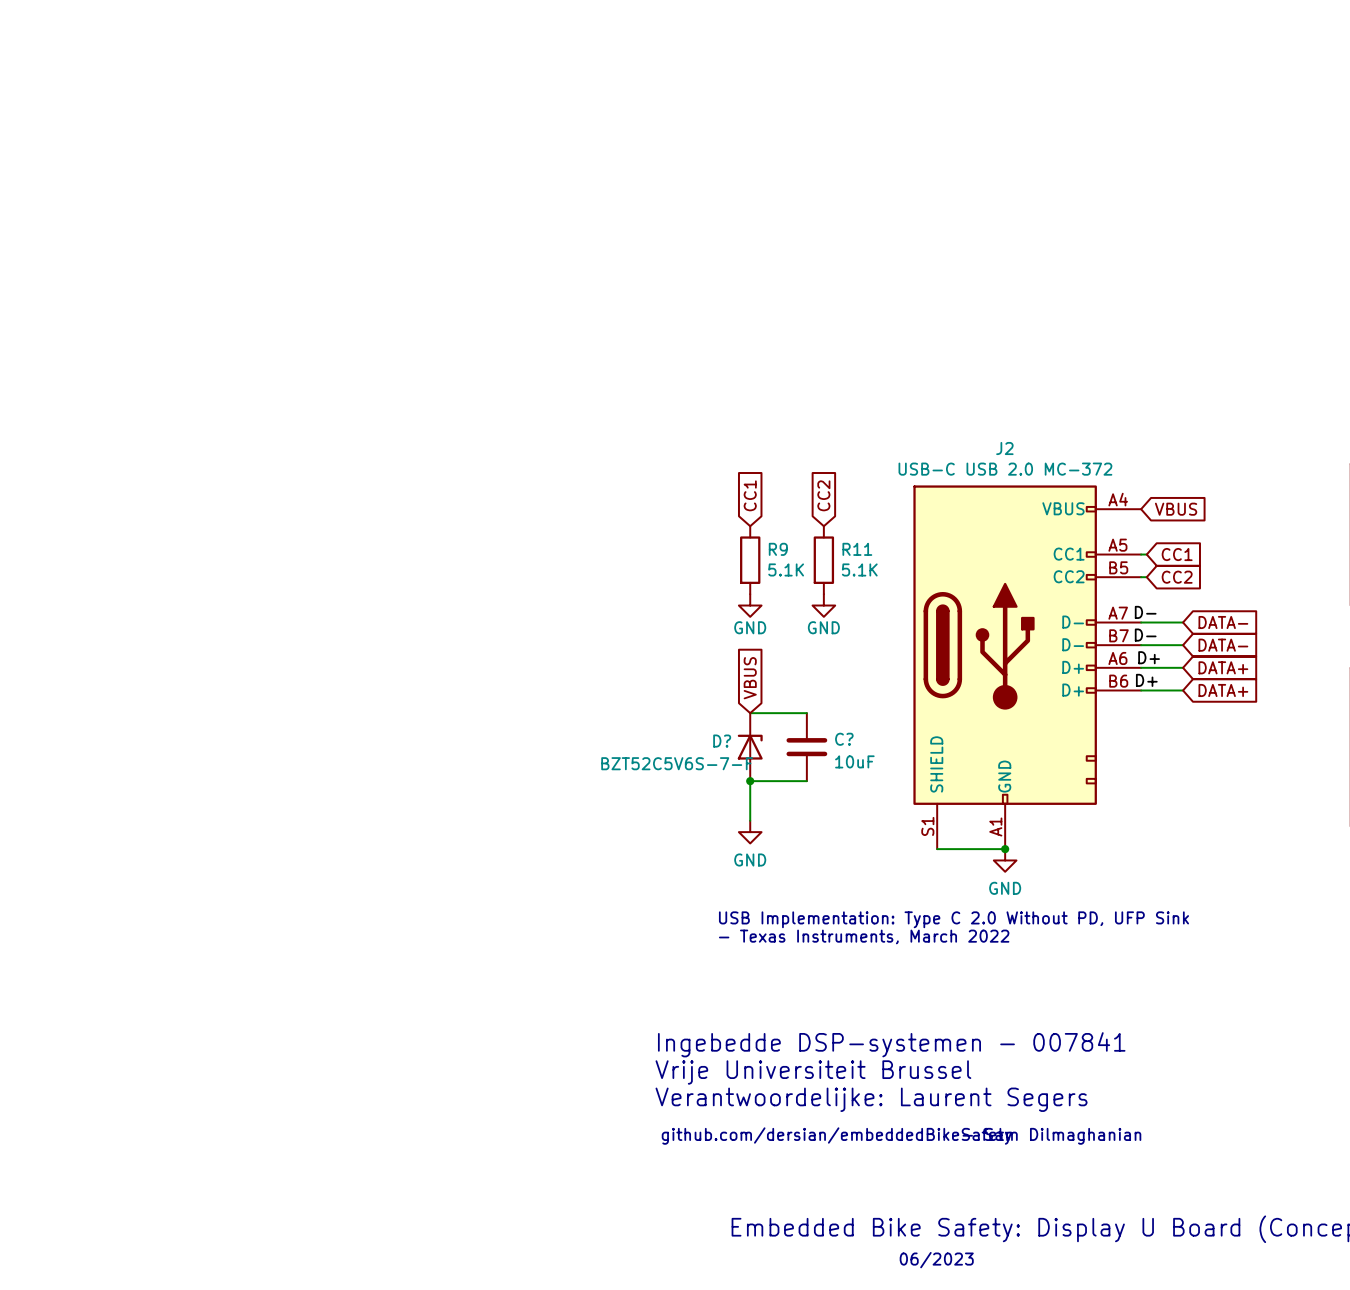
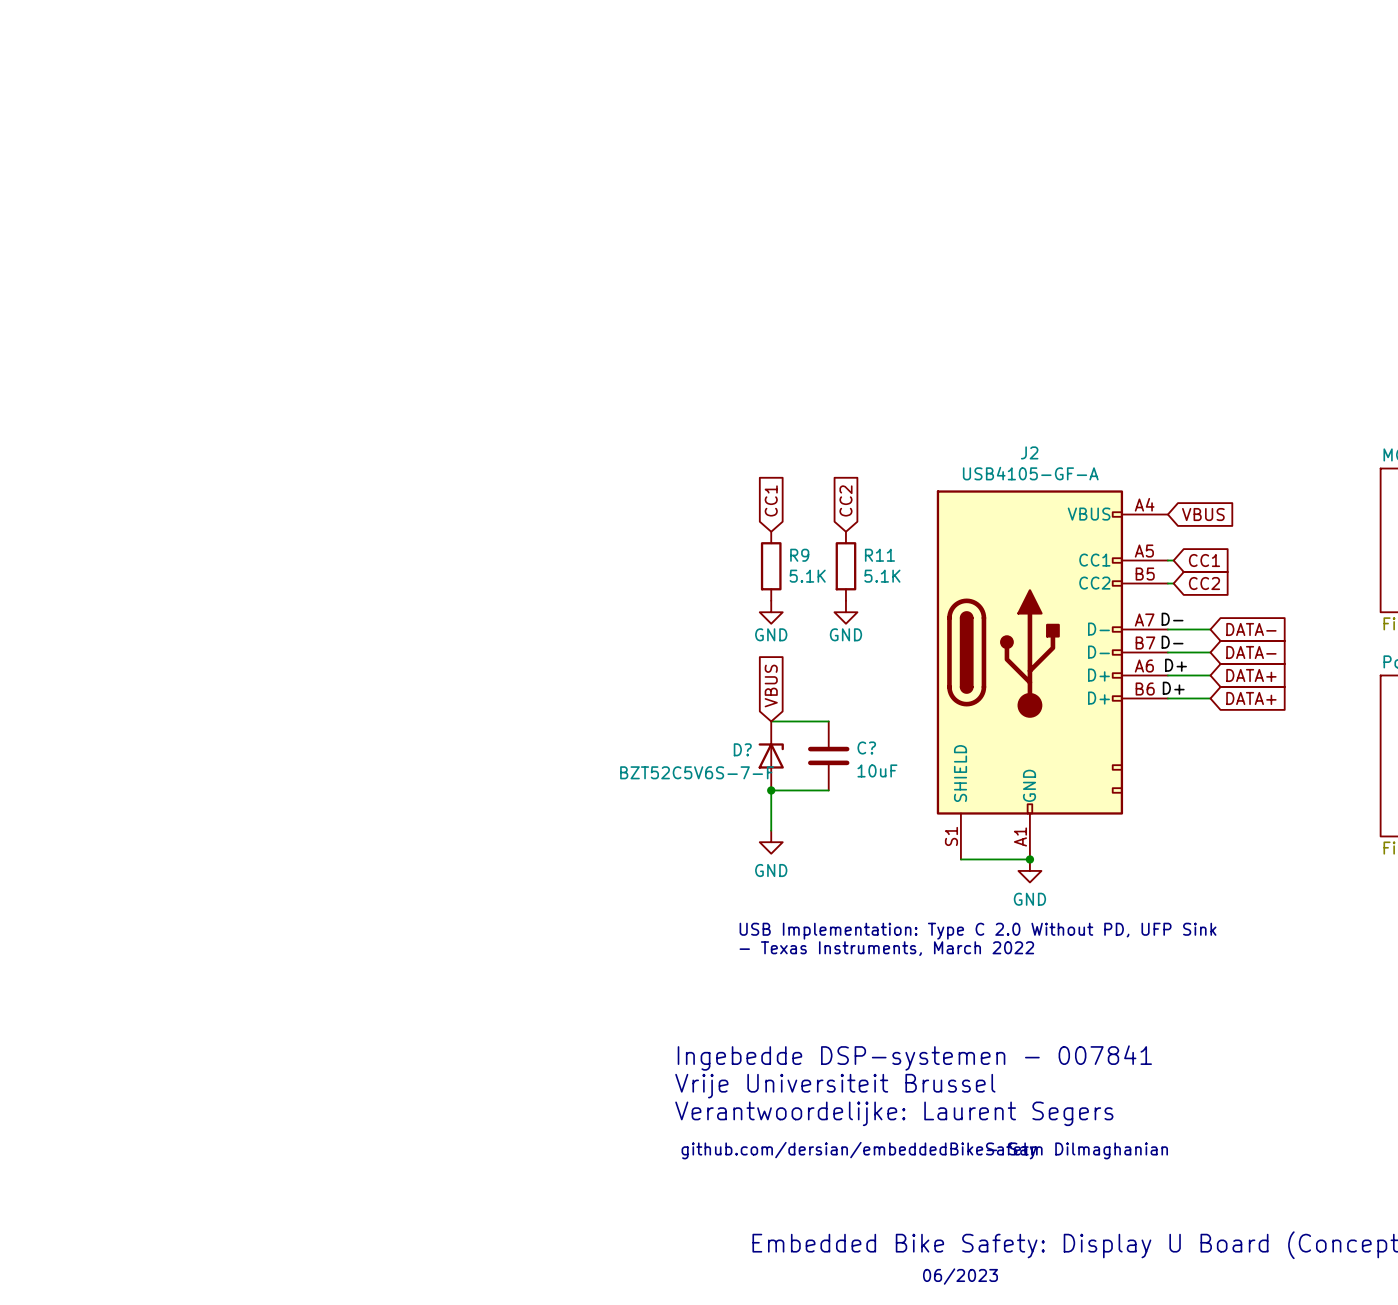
J2 value: USB-C USB 2.0 MC-372 (1005, 469) -> USB4105-GF-A (1030, 473)

